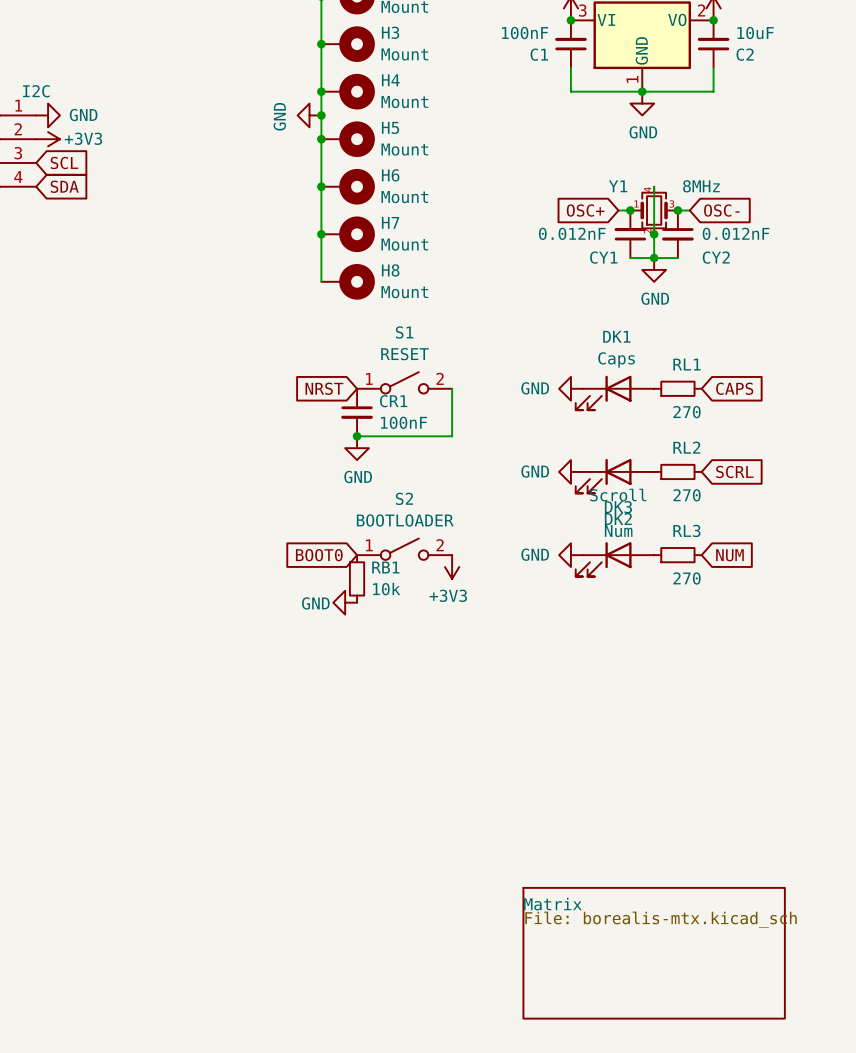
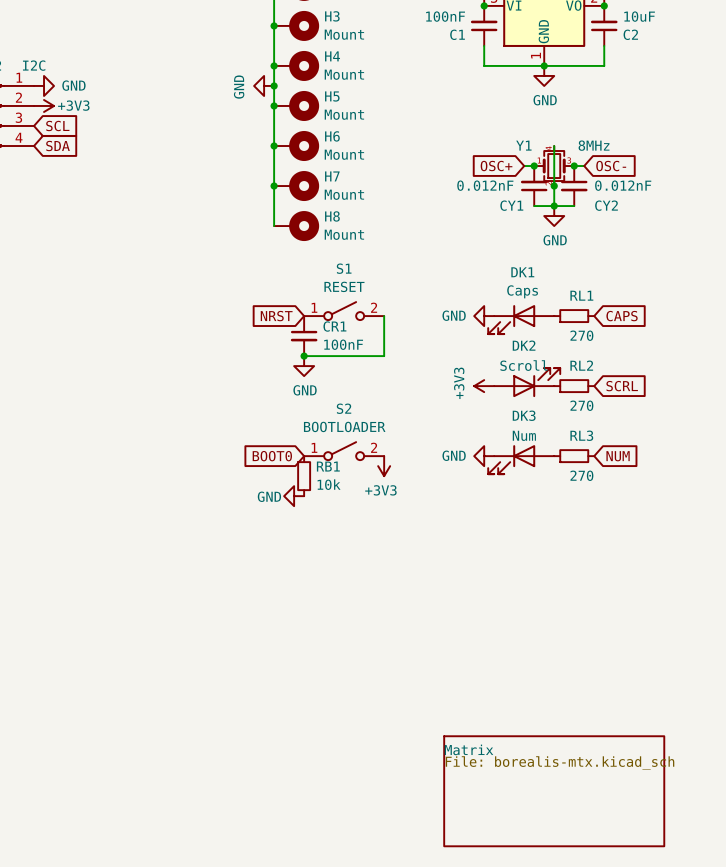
power symbol: GND (570, 471) -> +3V3 (484, 386)
DK2 rotation: 0° (603, 476) -> 180° (536, 382)

